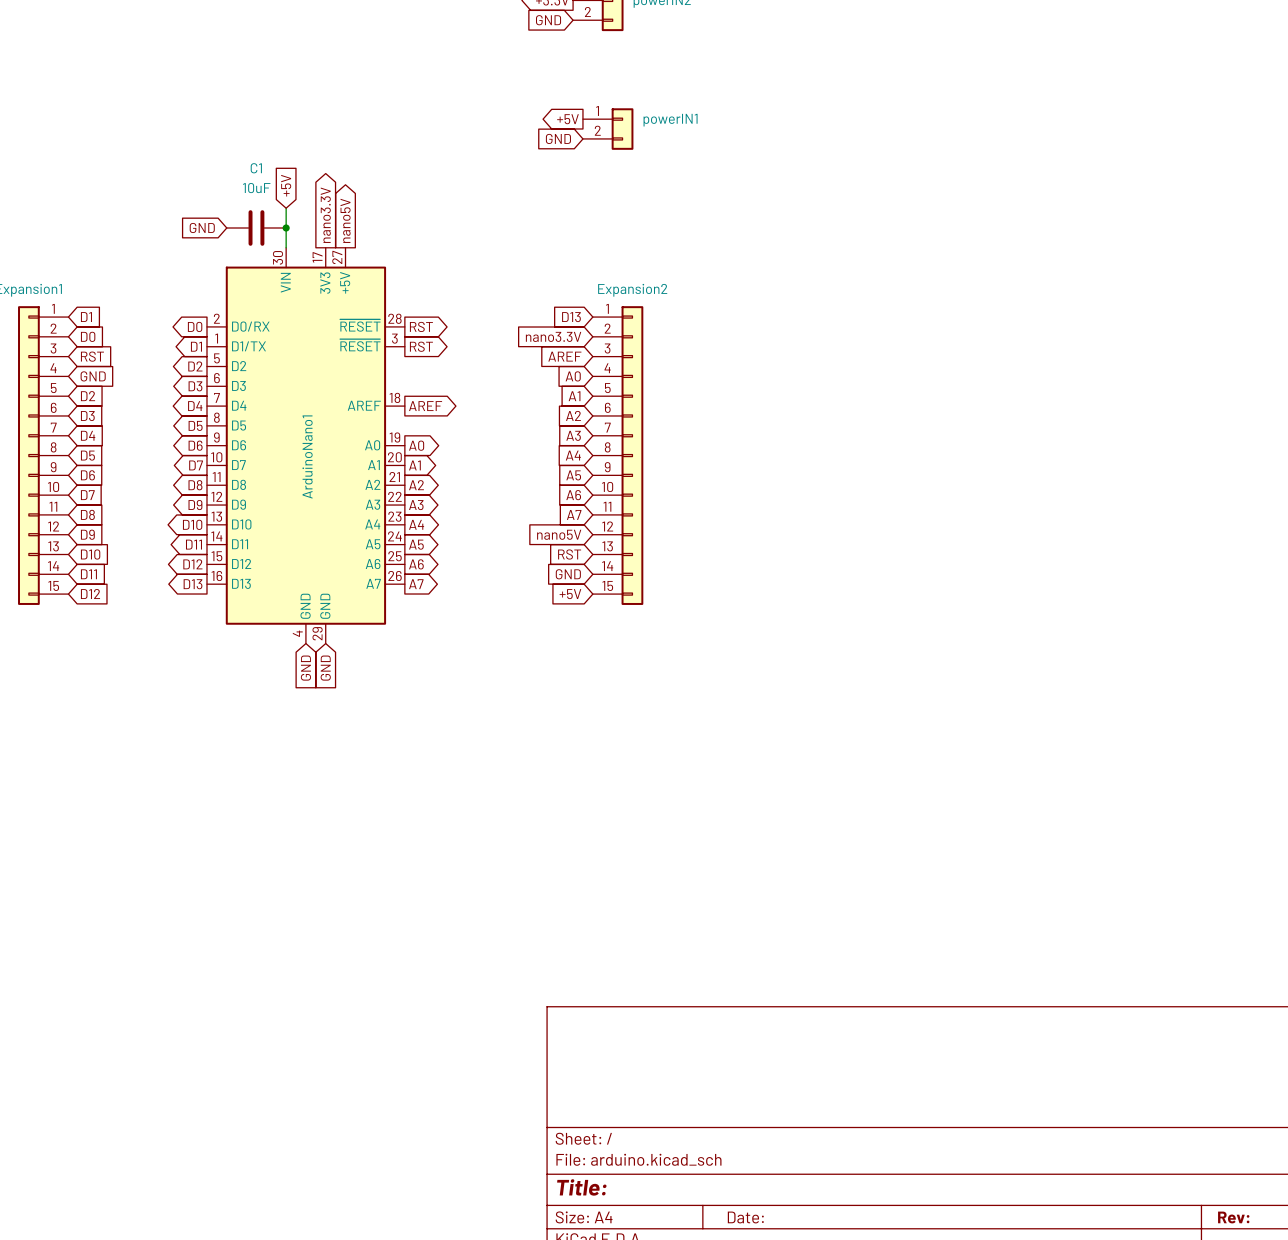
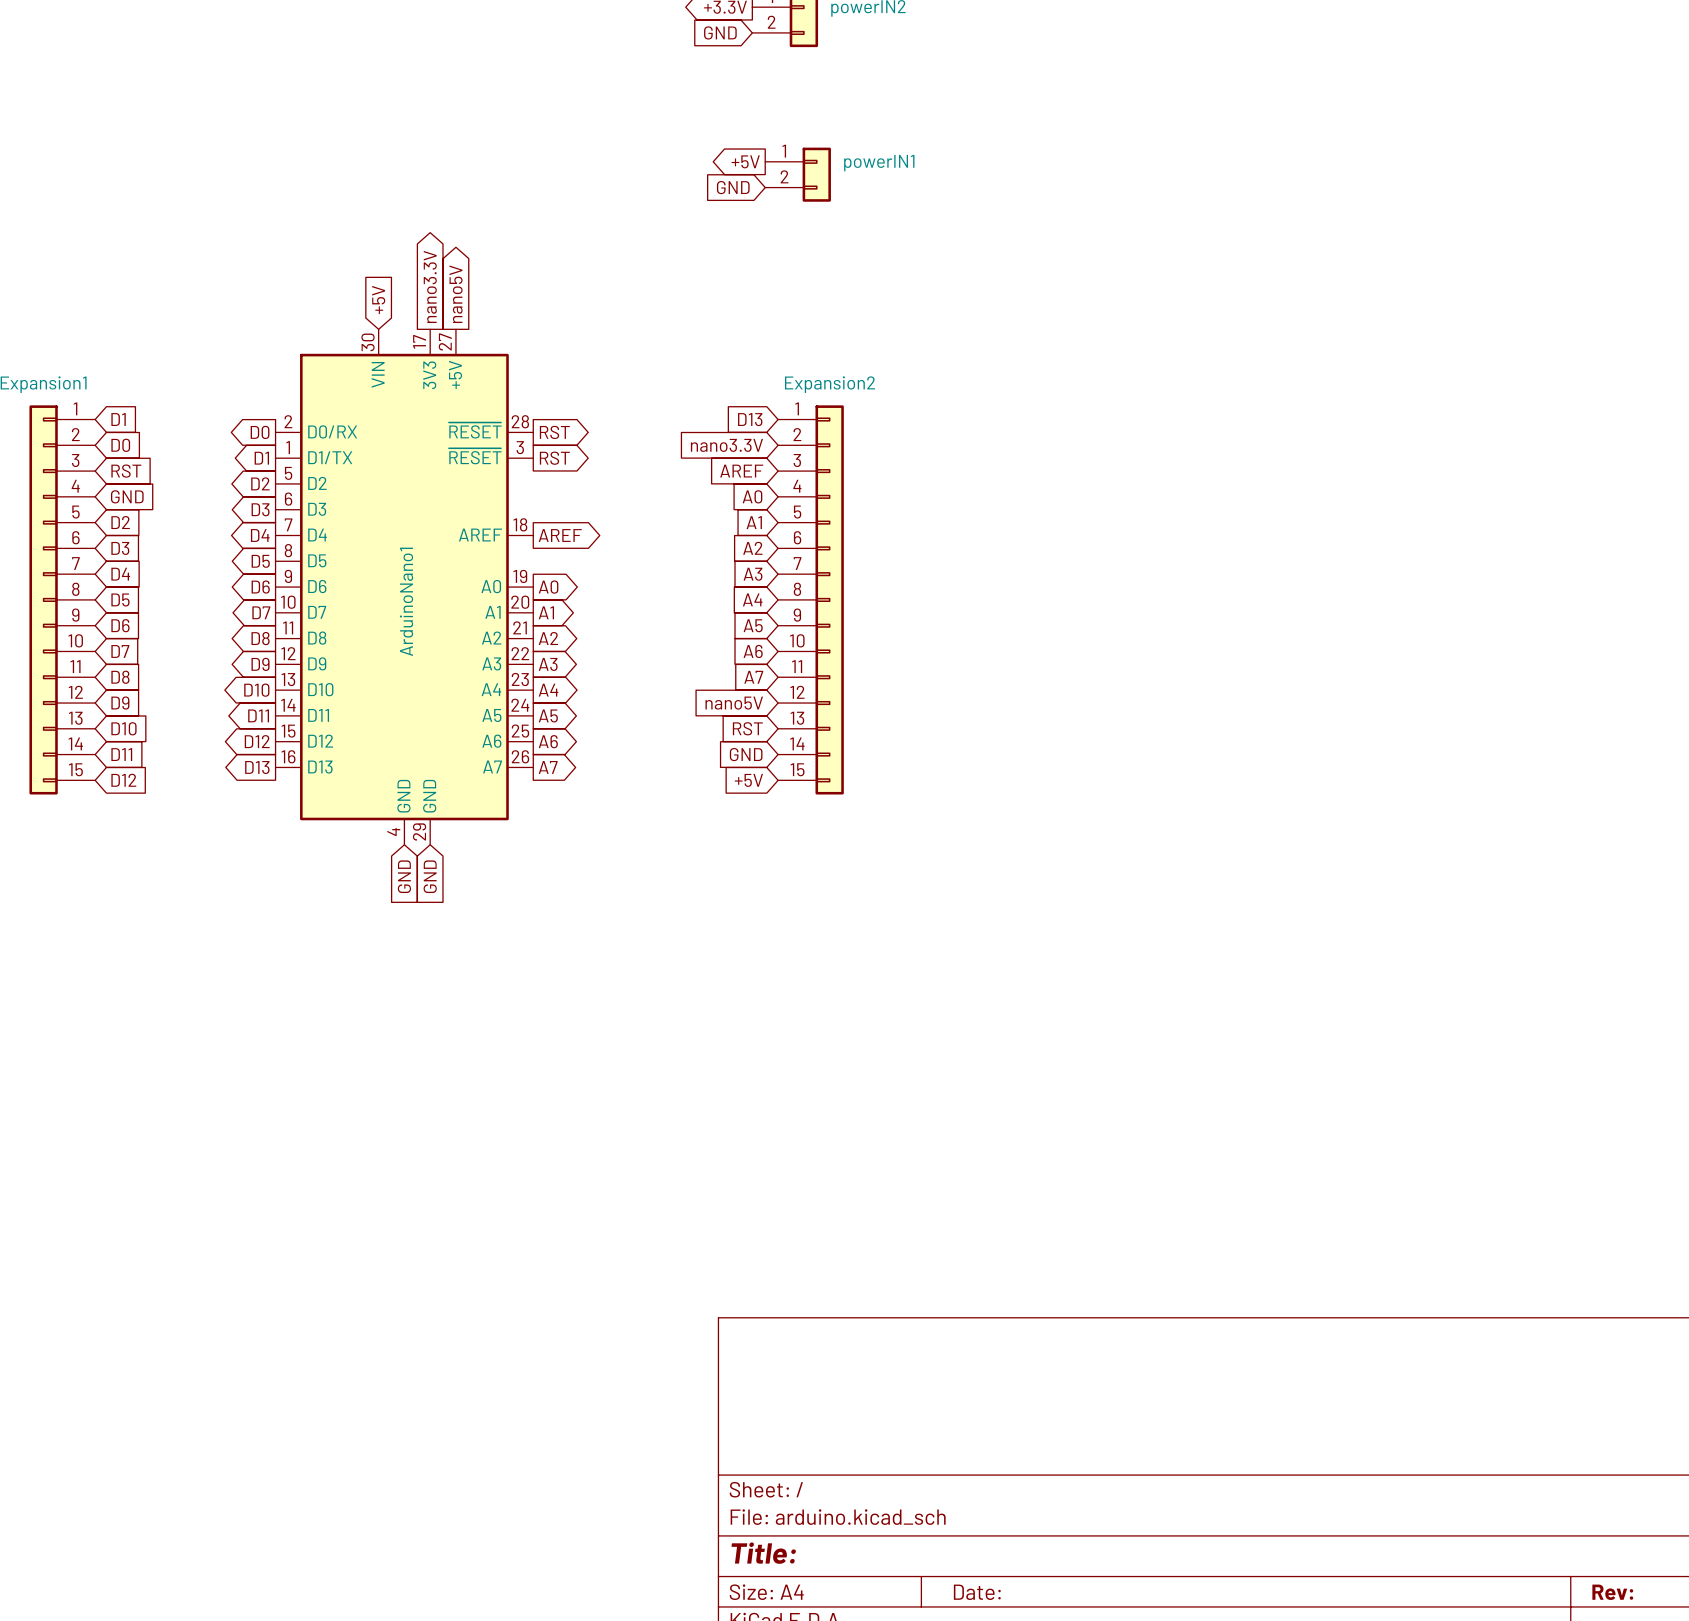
global label position: +5V (286, 185) -> +5V (378, 300)
wire: (286, 208) (286, 247) -> none
global label: GND (202, 227) -> none
C1: 10uF (256, 227) -> none
junction: (286, 227) -> none

